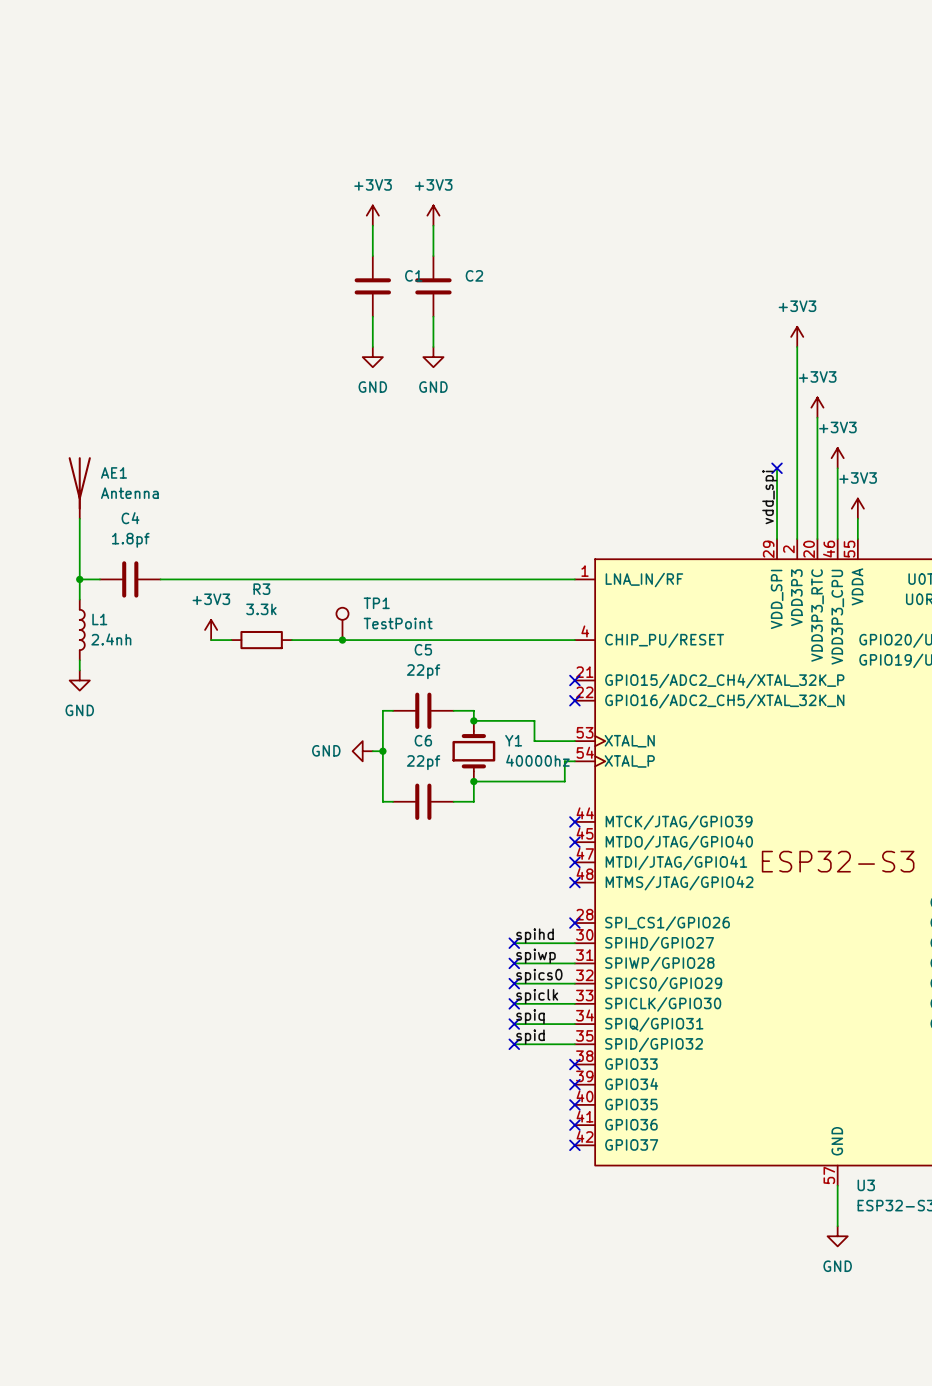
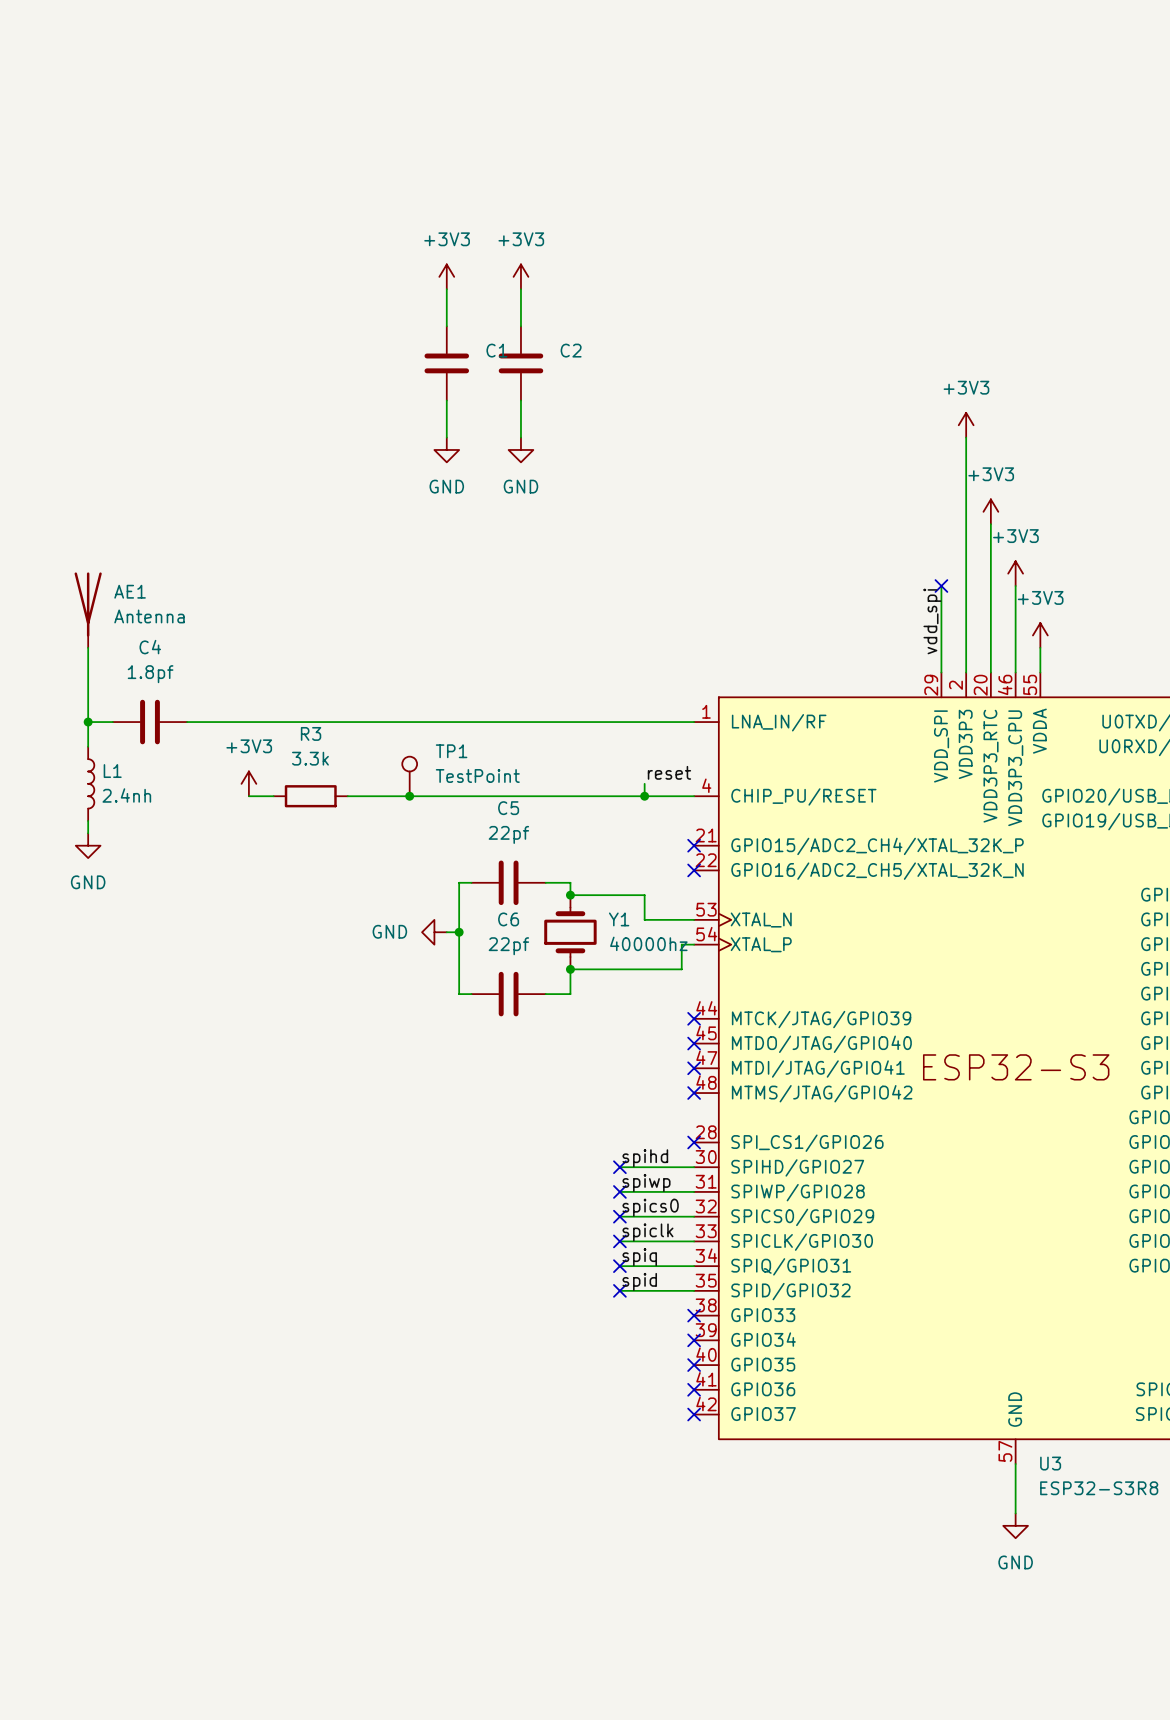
label: none -> reset (669, 772)
wire: none -> (644, 783) (644, 796)
junction: none -> (644, 796)

